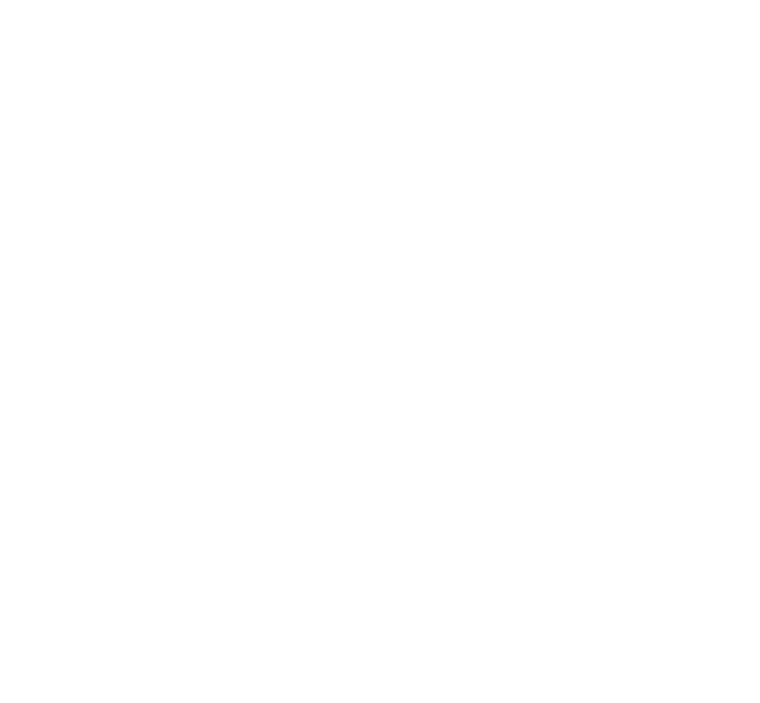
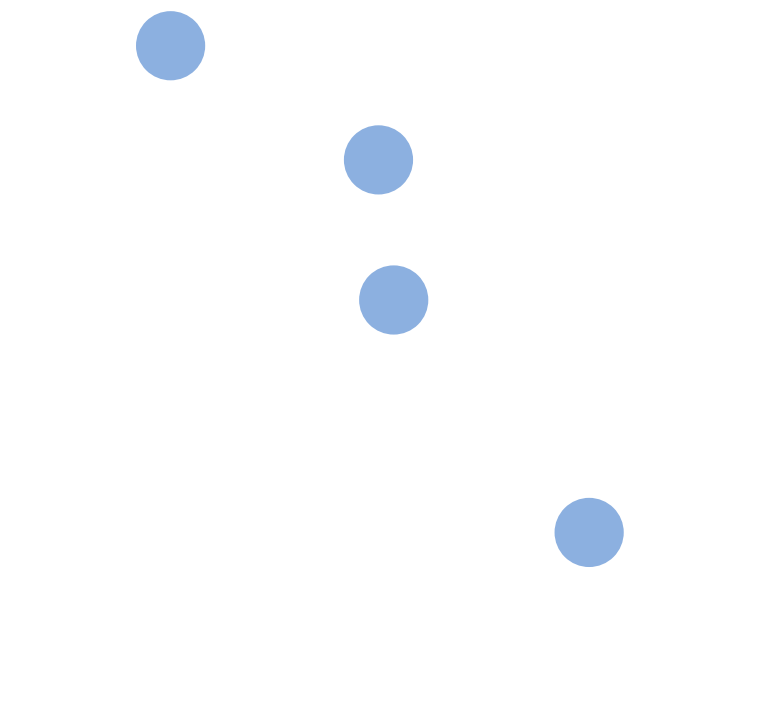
part: none -> (170, 45)
part: none -> (378, 159)
part: none -> (393, 299)
part: none -> (589, 532)

